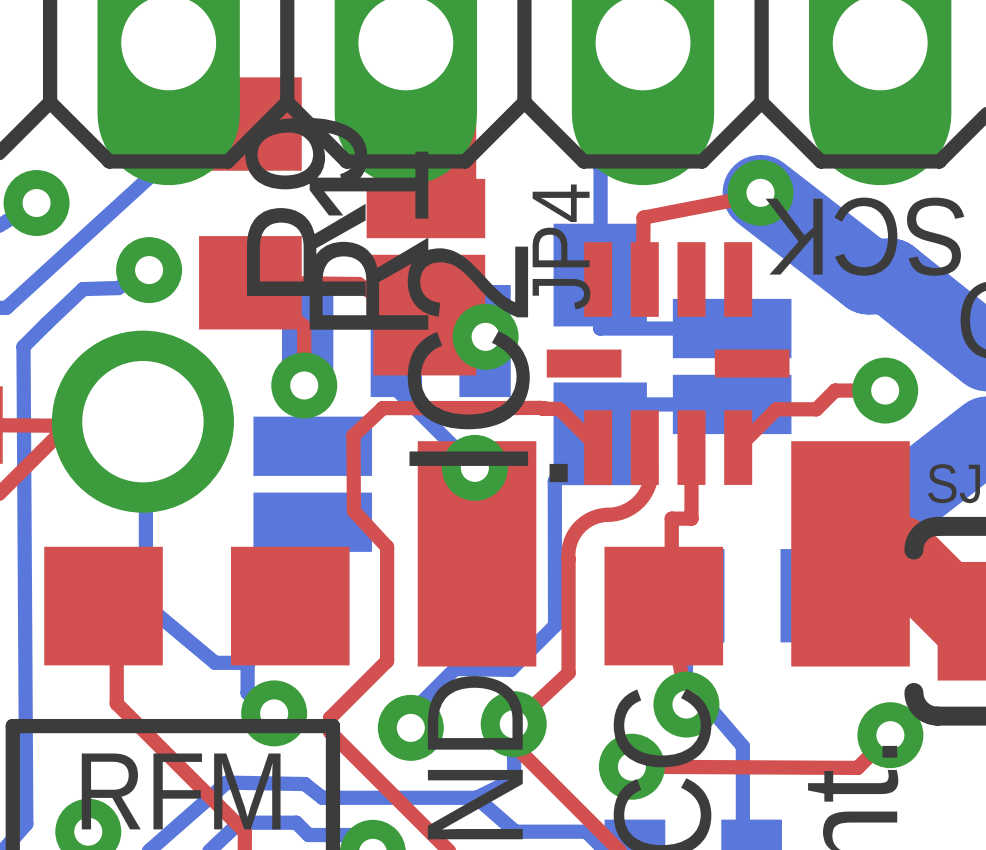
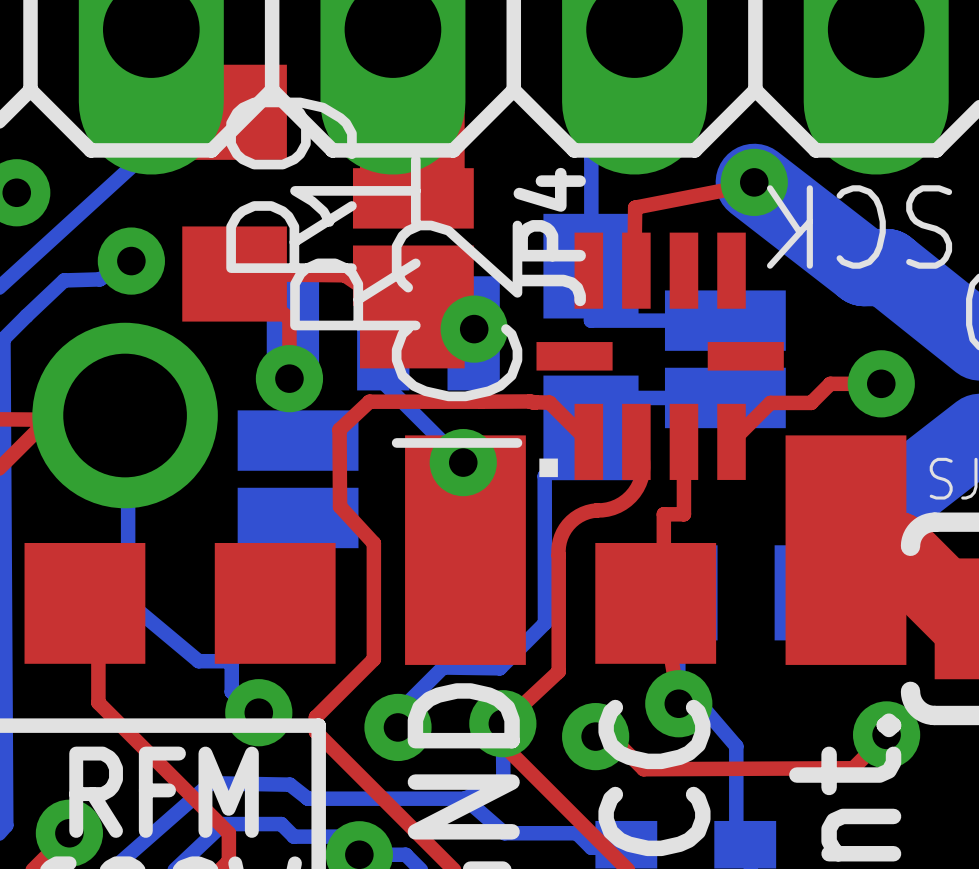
top track: (631, 766) (857, 767) -> (595, 736) (611, 736) (643, 769) (853, 768)
via position: (631, 766) -> (595, 736)

